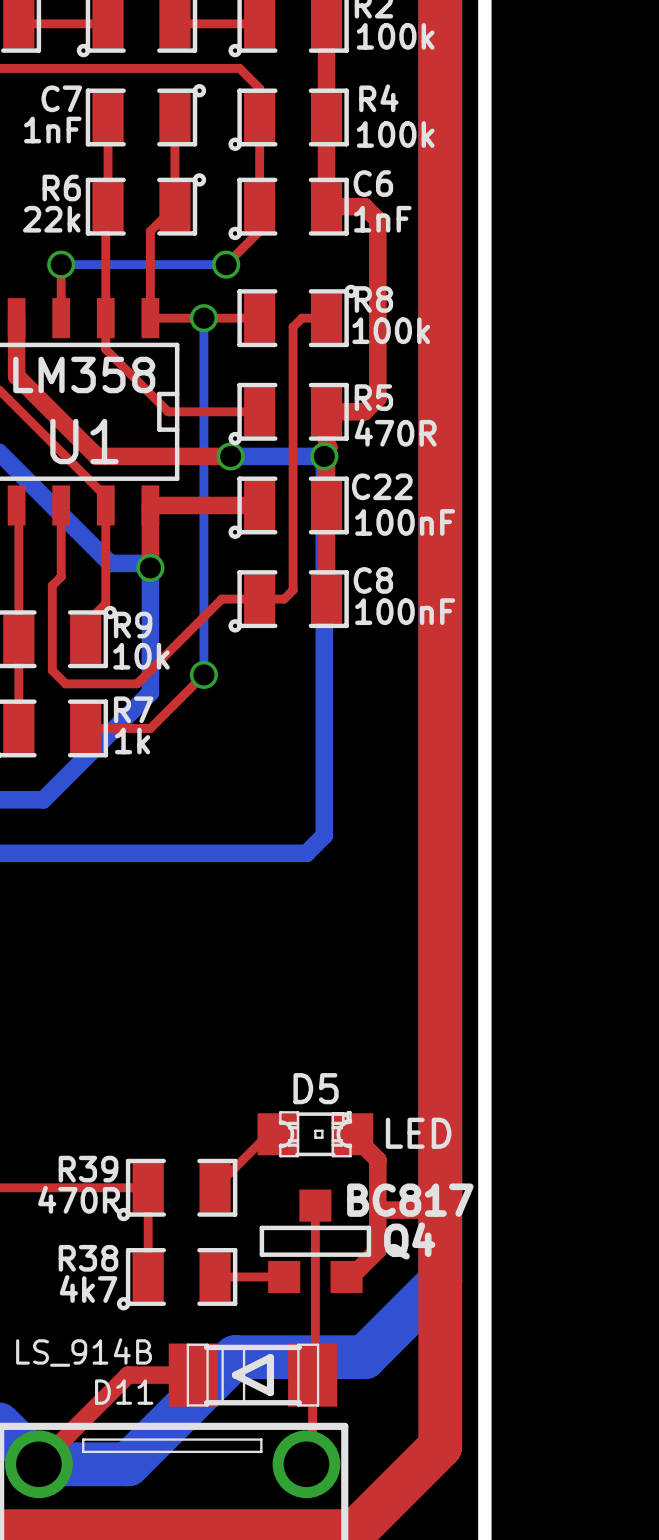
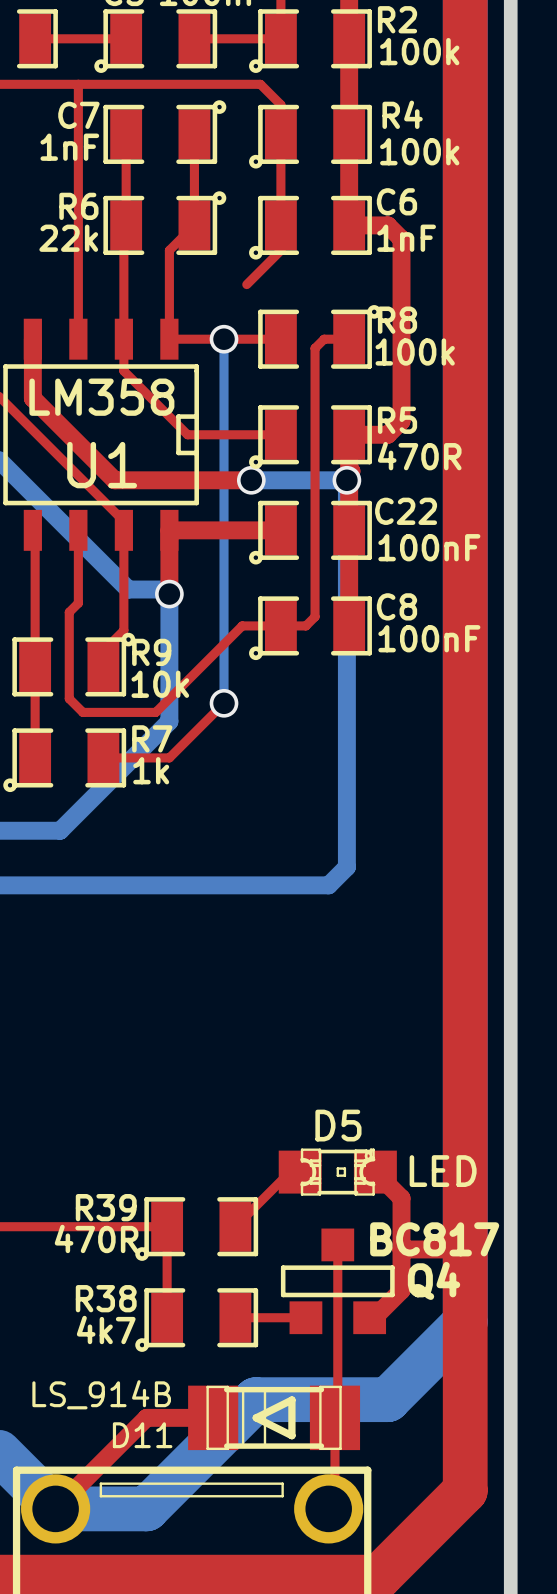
top track: none -> (78, 84) (78, 284)
bottom track: (61, 264) (226, 264) -> none
via: (61, 264) -> none
via: (226, 264) -> none

